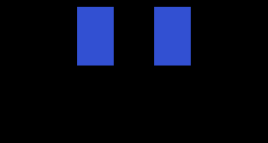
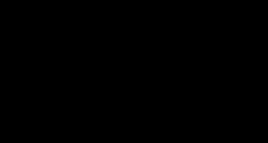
part: (133, 36) -> none

